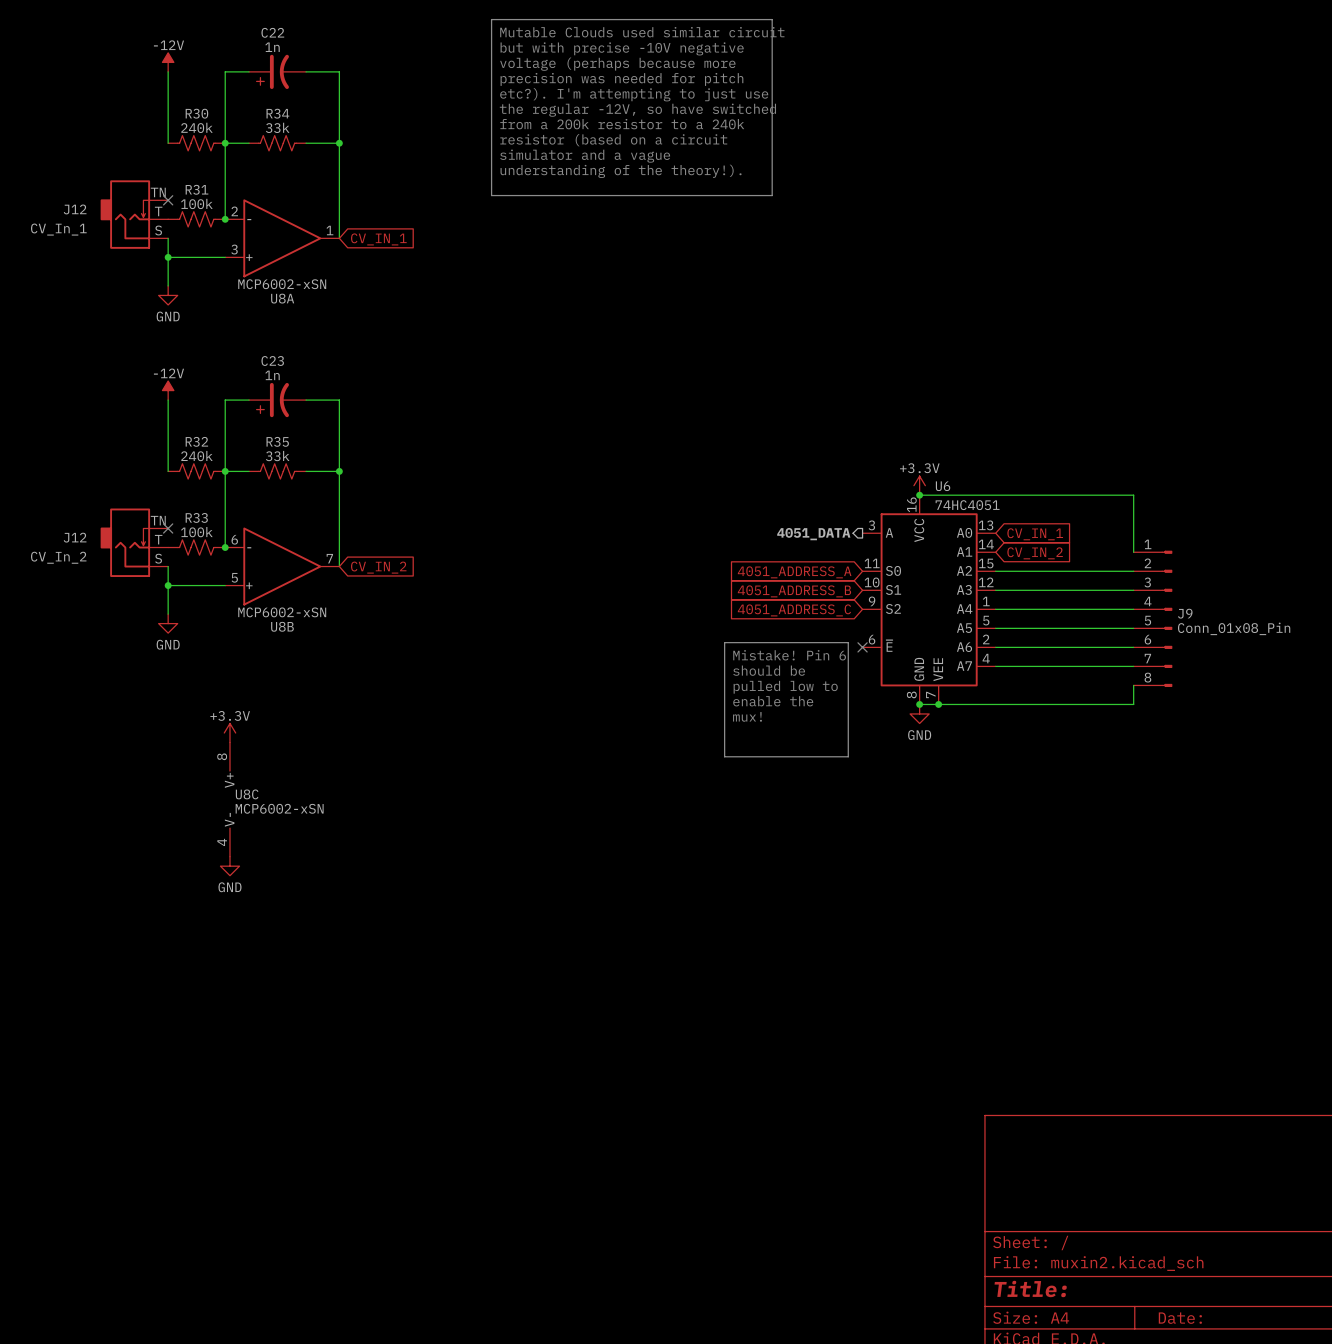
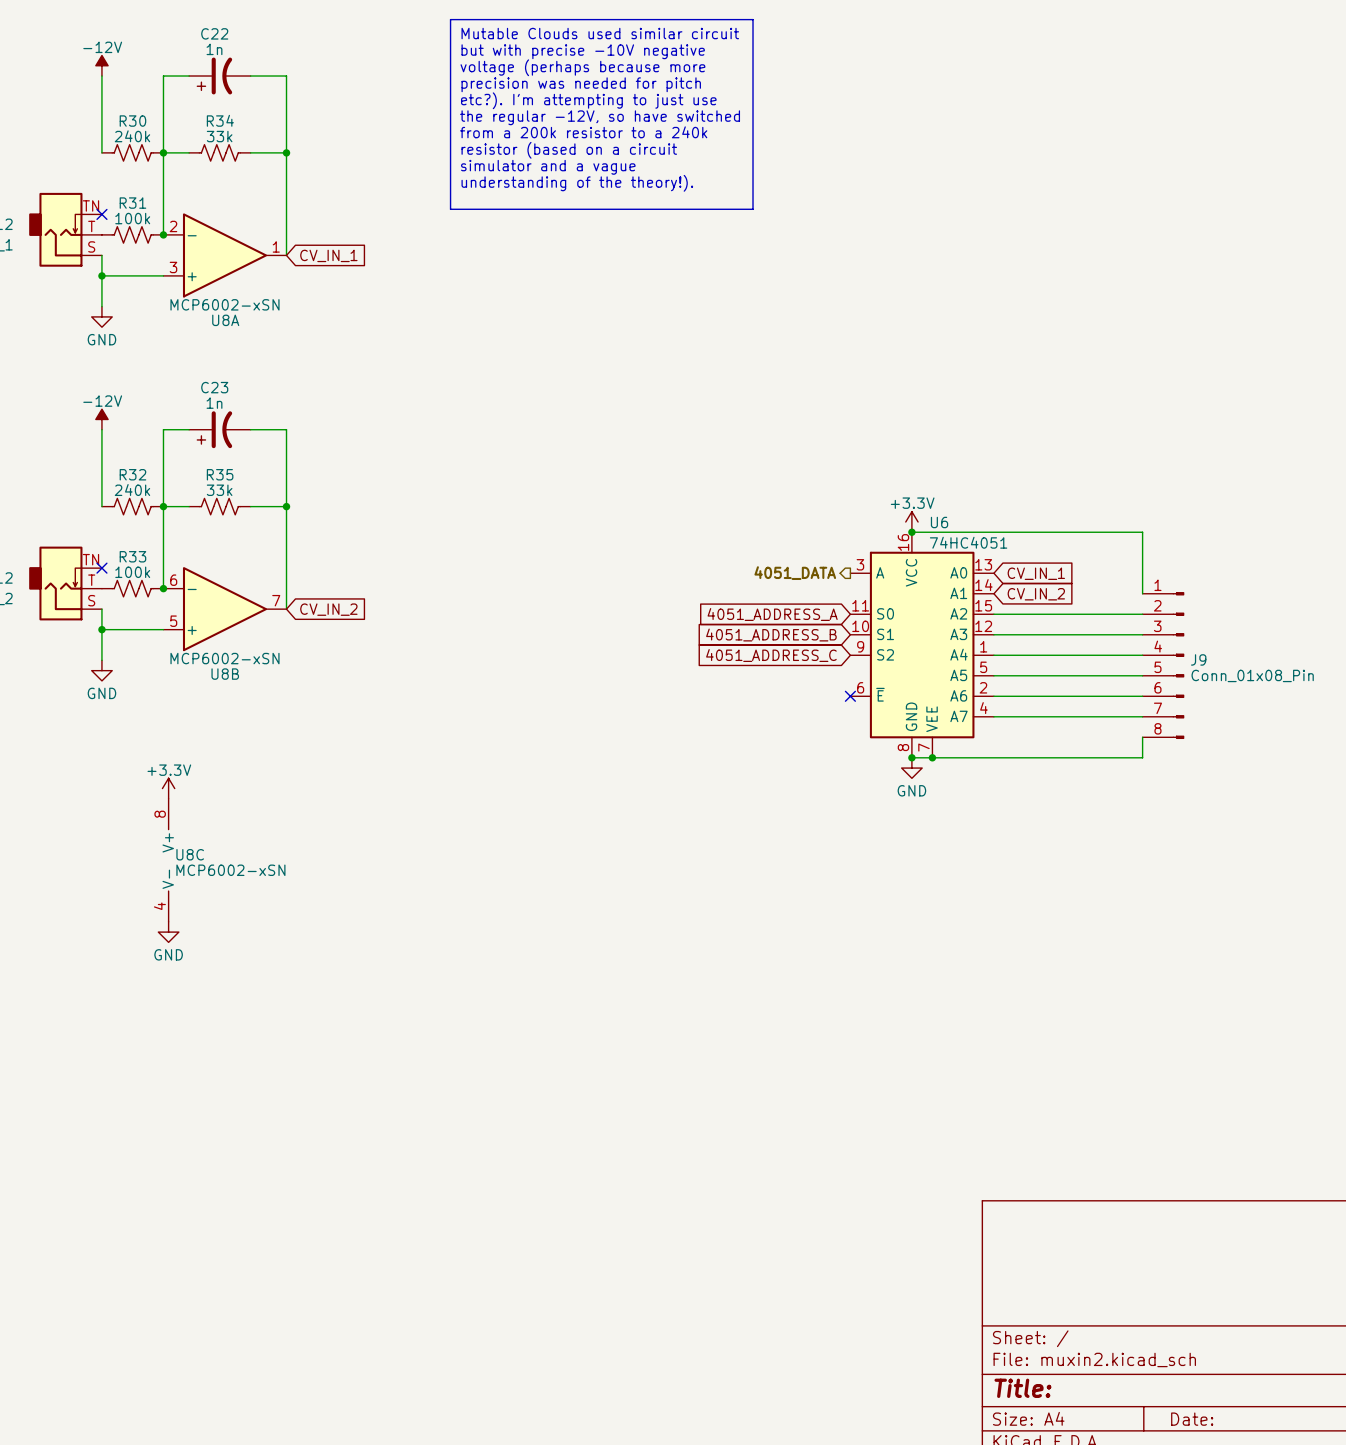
line: (724, 642) (848, 642) (848, 756) (724, 756) (724, 642) -> none
text: Mistake! Pin 6 (789, 655) -> none
text: should be (769, 670) -> none
text: pulled low to (785, 687) -> none
text: enable the (773, 701) -> none
text: mux! (747, 716) -> none

